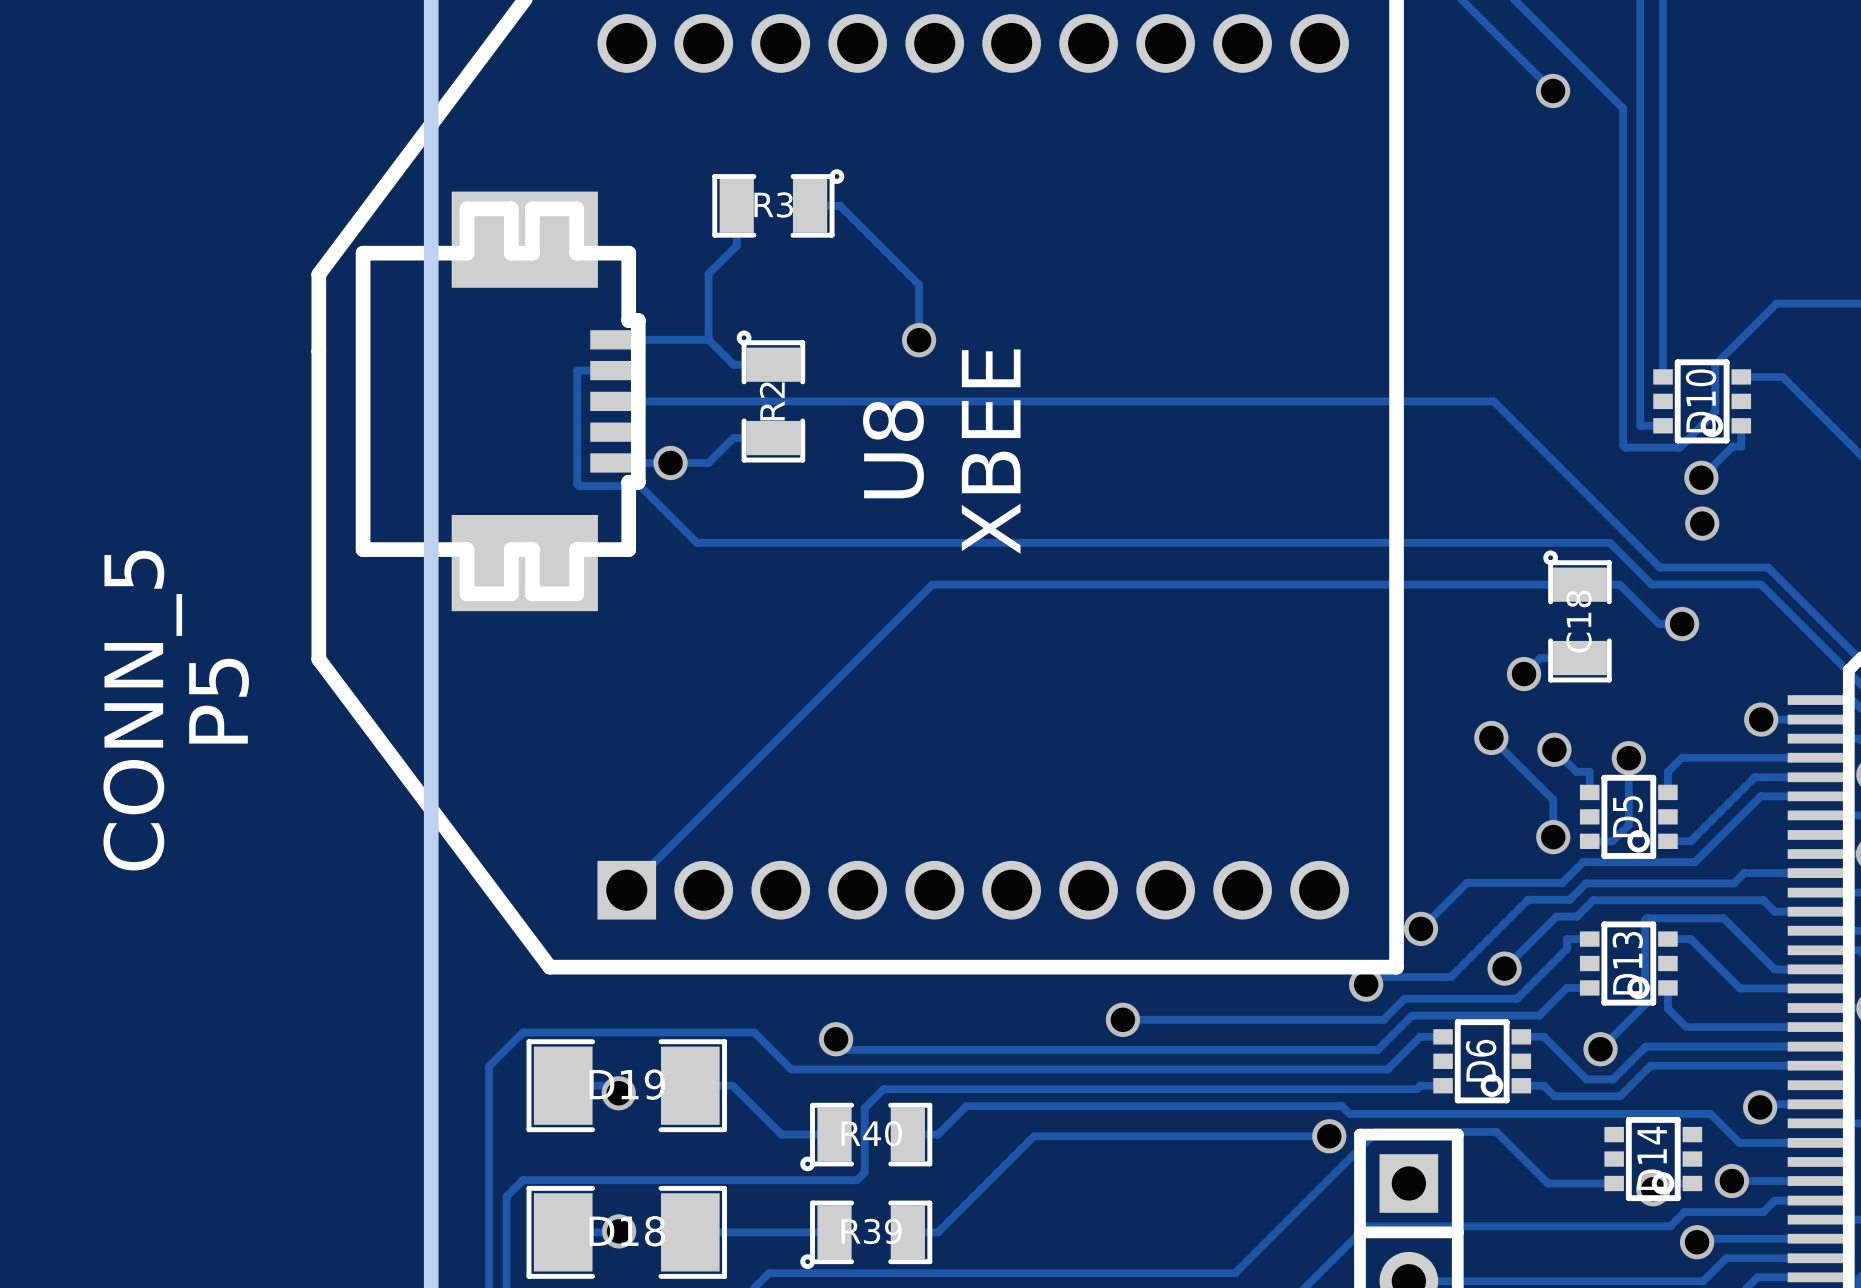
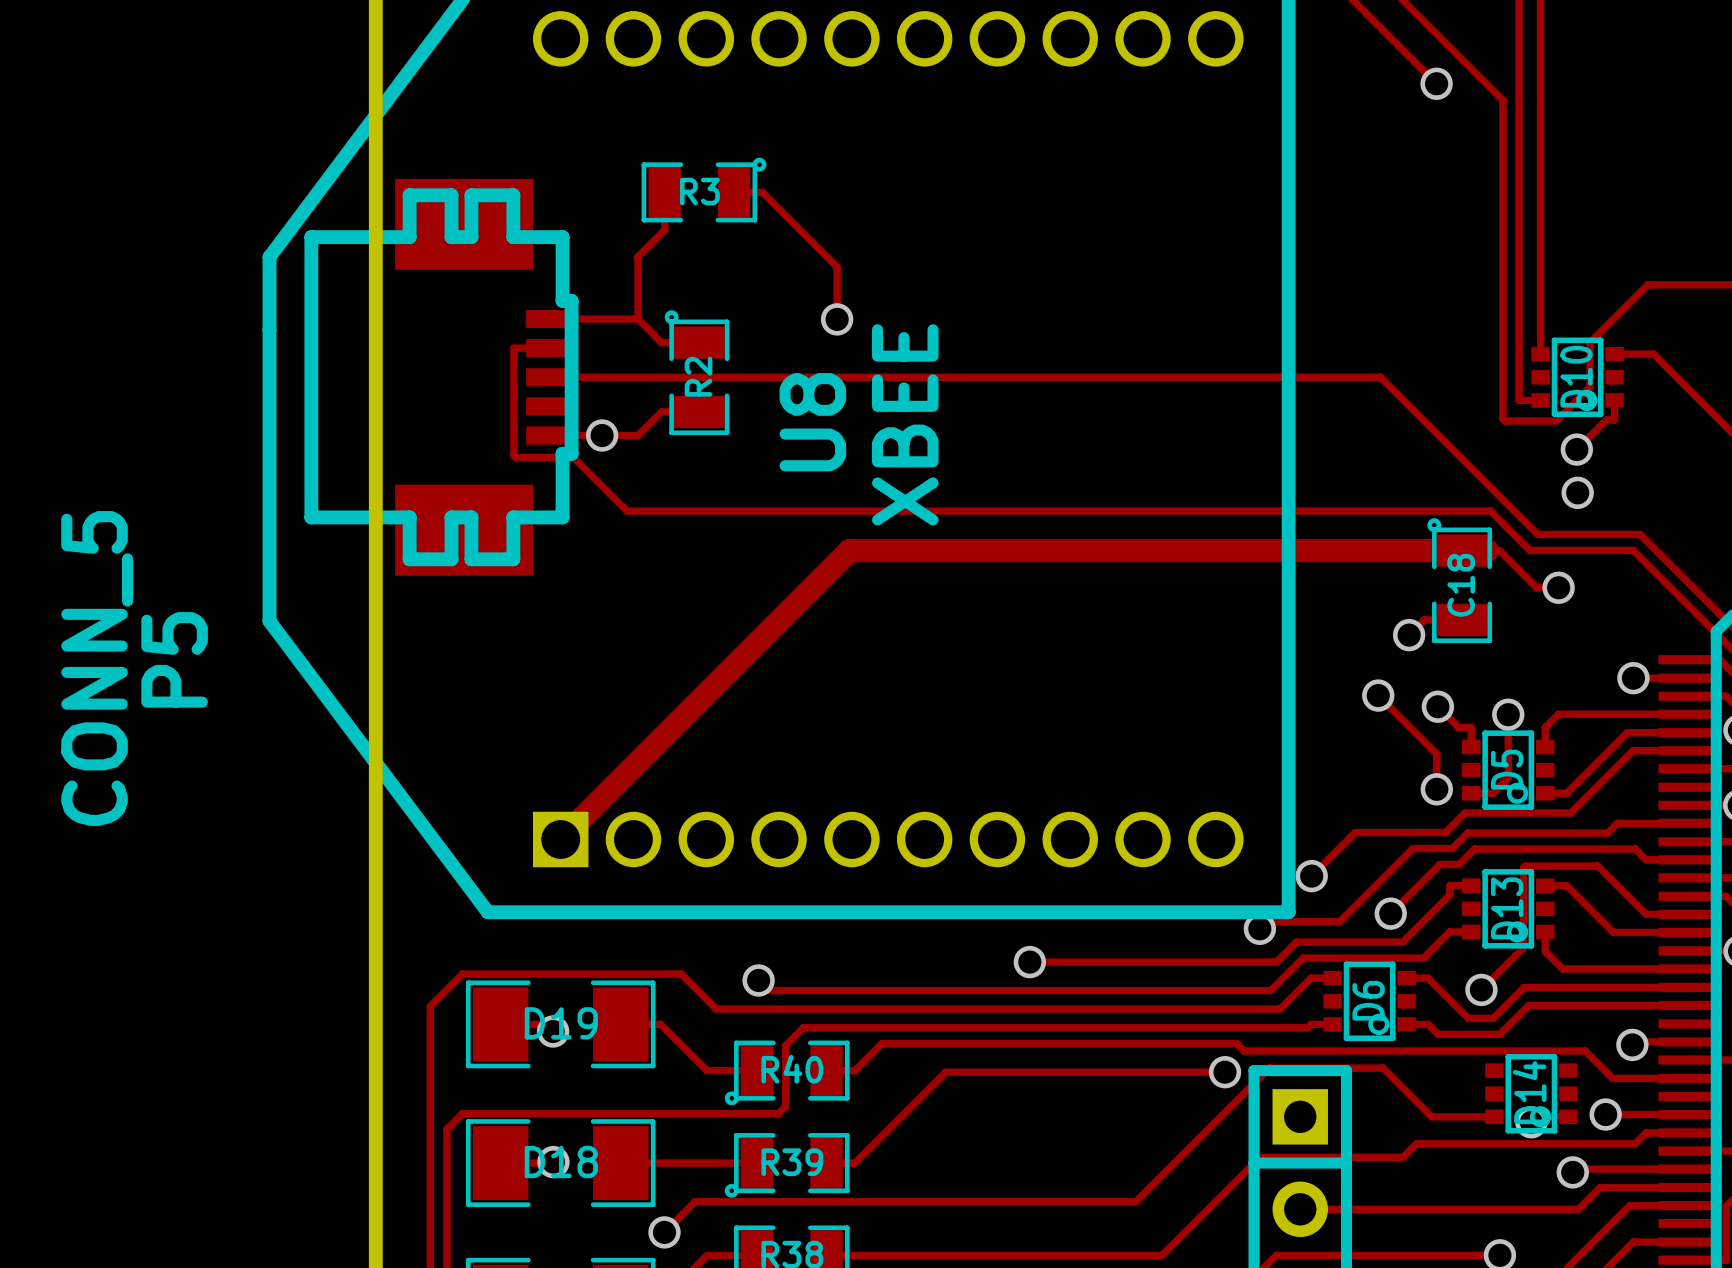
track width: thin (1606, 584) (932, 584) (626, 890) -> thick (1487, 550) (849, 550) (560, 839)
track: (1684, 1212) (1670, 1226) (1517, 1226) -> (1561, 1143) (1416, 1143) (1403, 1157)

